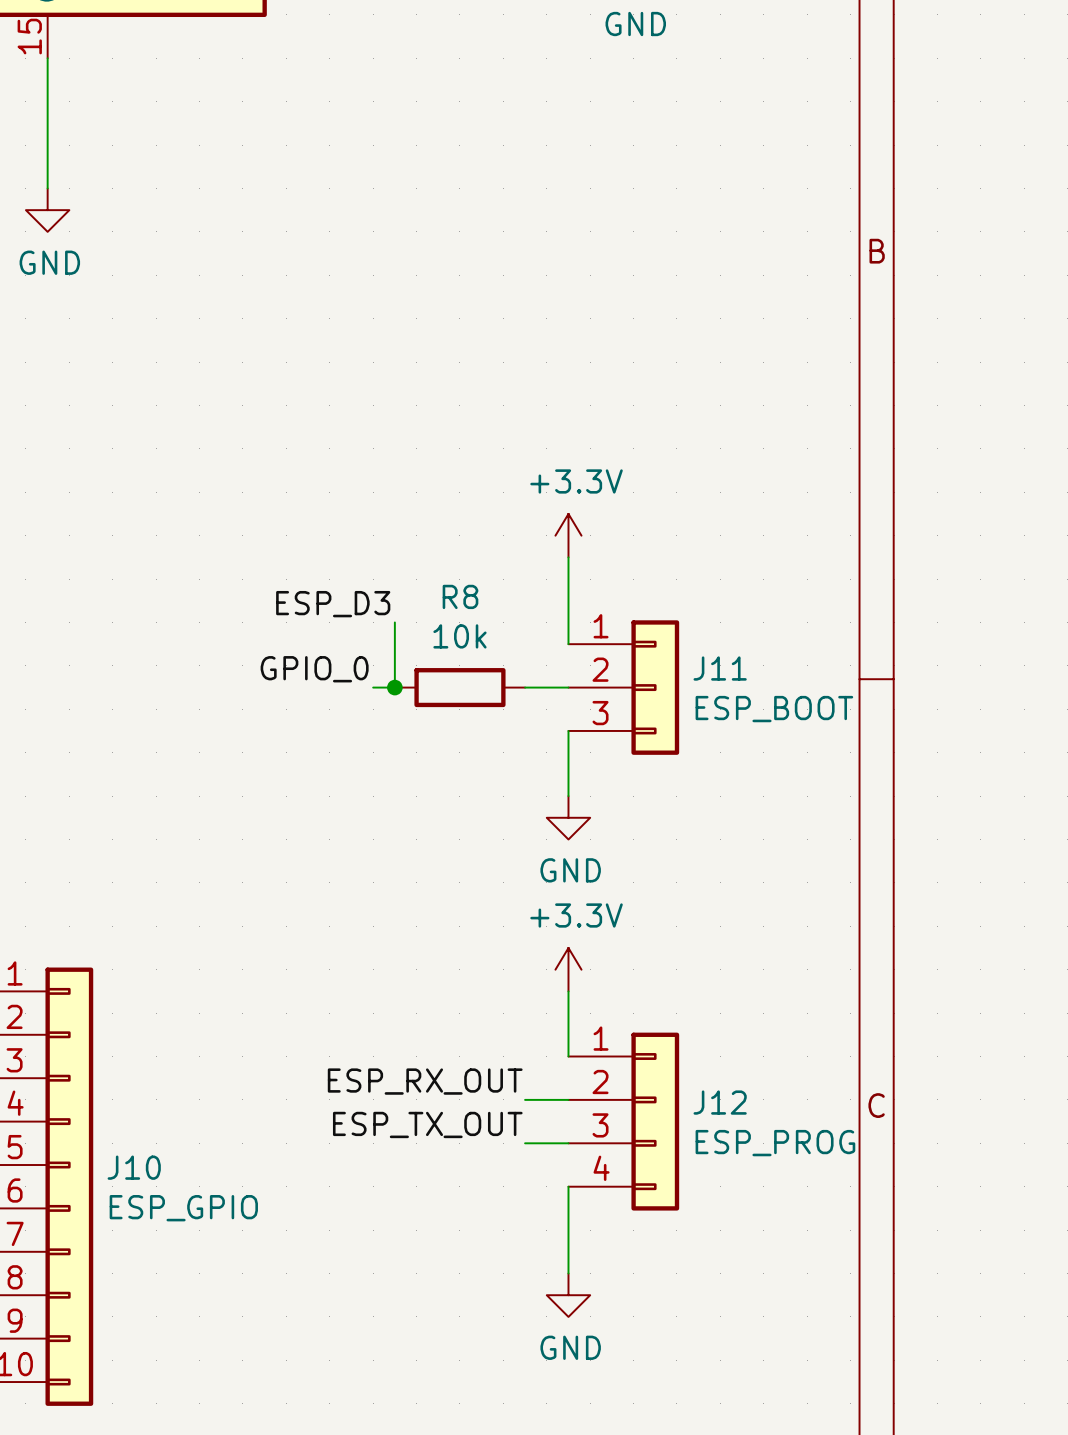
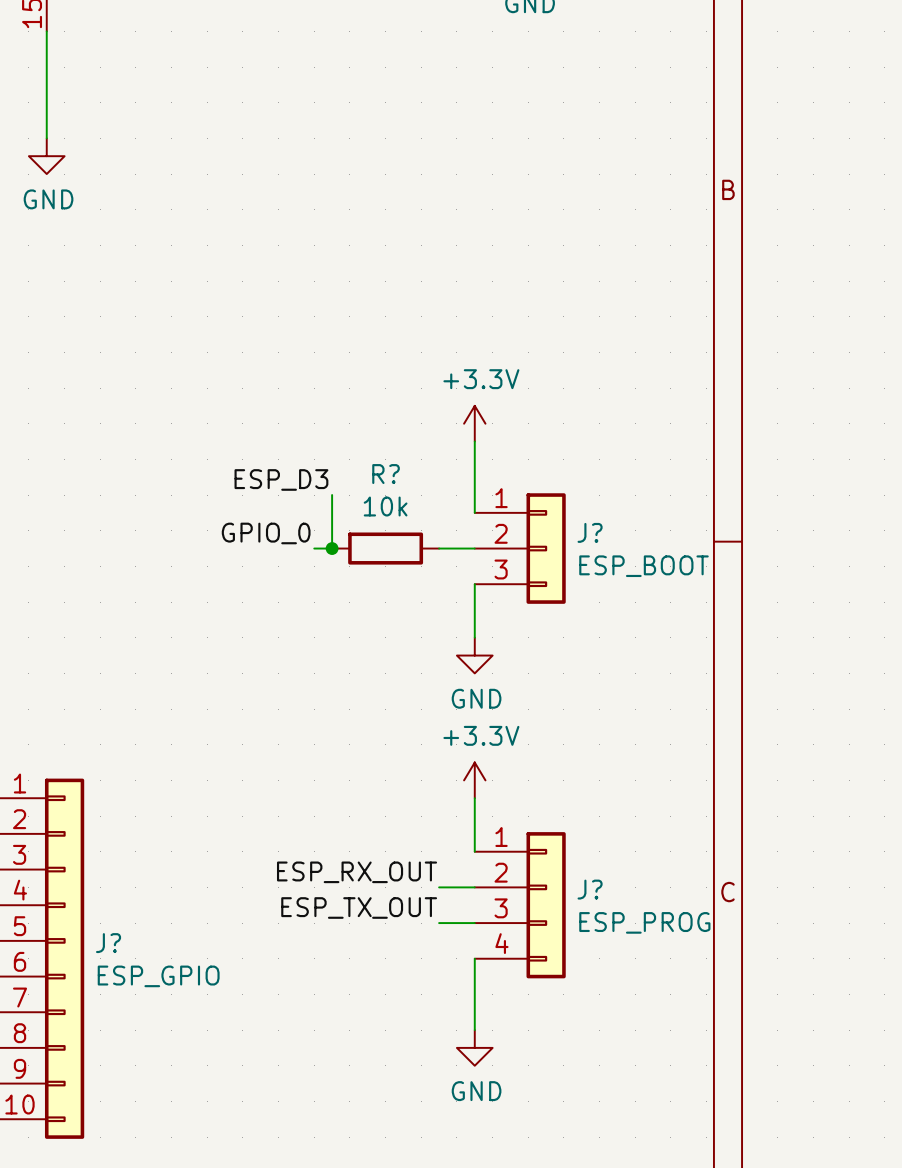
R8 name: R8 (460, 596) -> R? (386, 474)
J11 name: J11 (720, 668) -> J? (590, 532)
J12 name: J12 (720, 1102) -> J? (590, 889)
J10 name: J10 (134, 1167) -> J? (108, 943)

